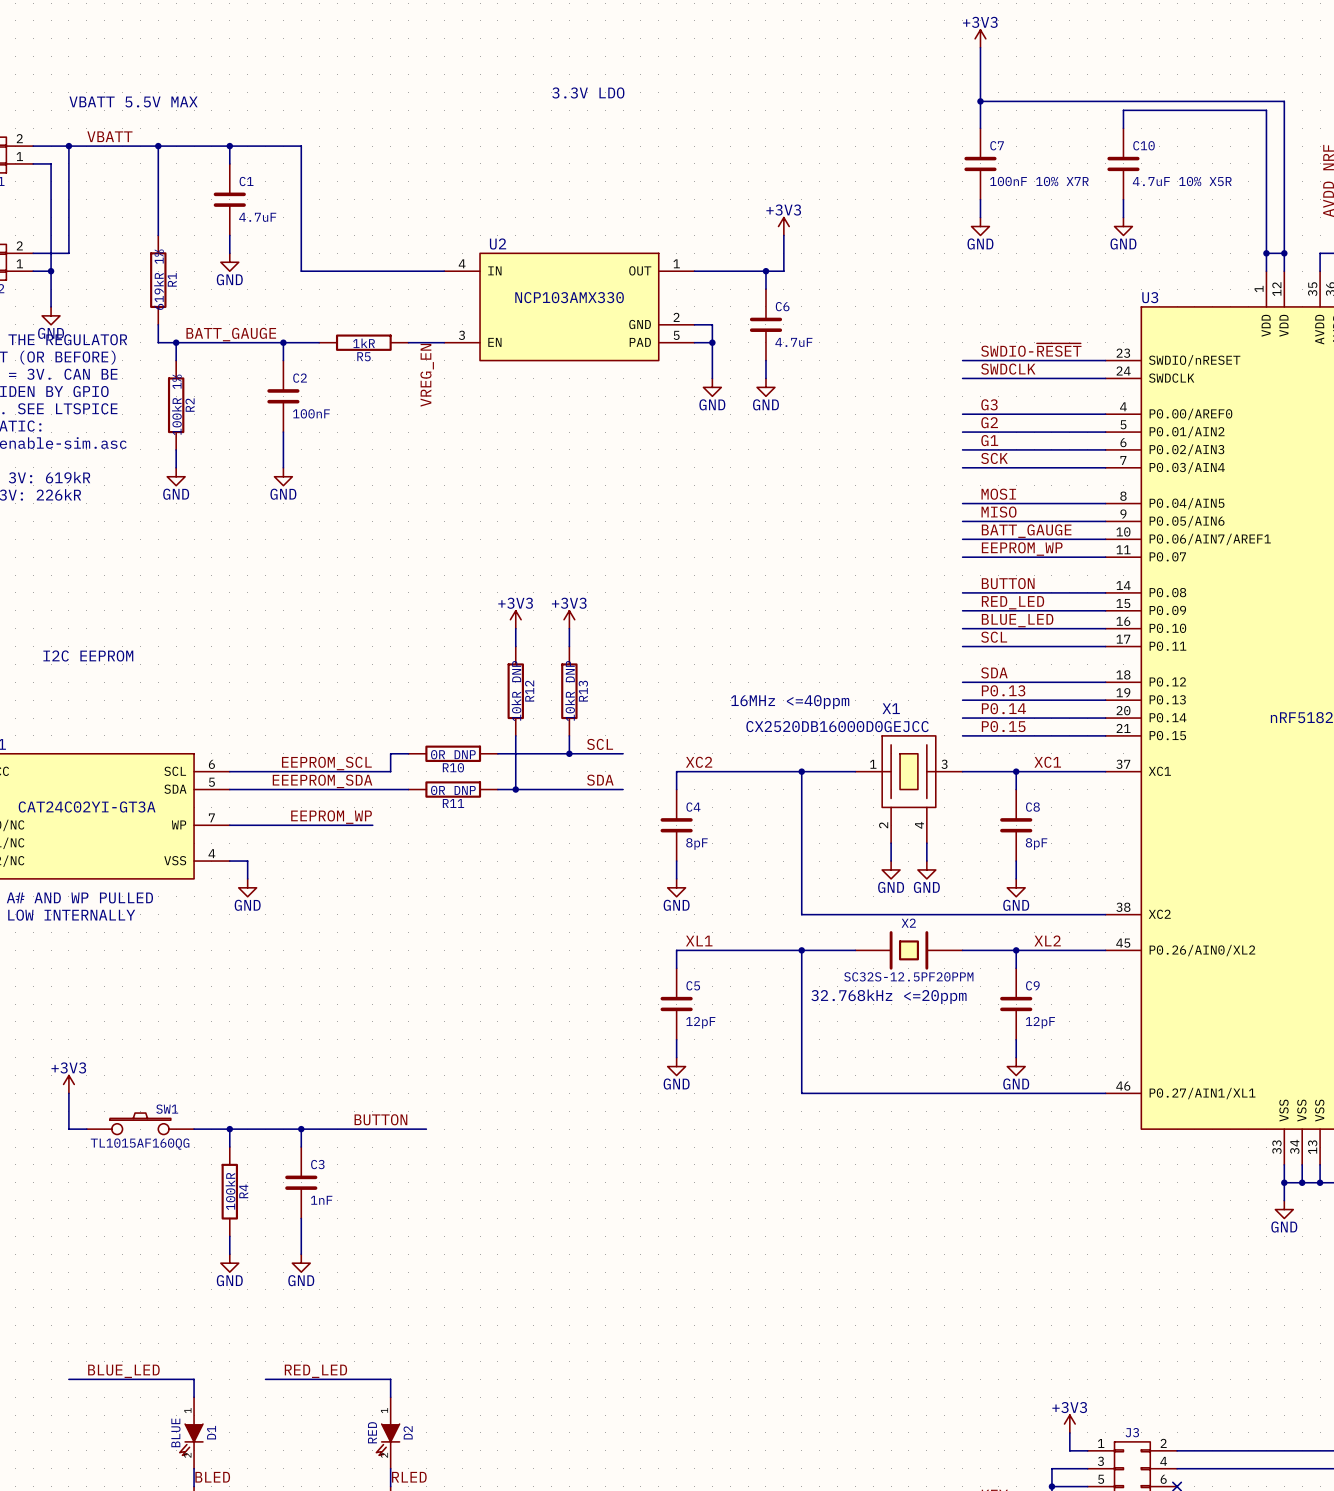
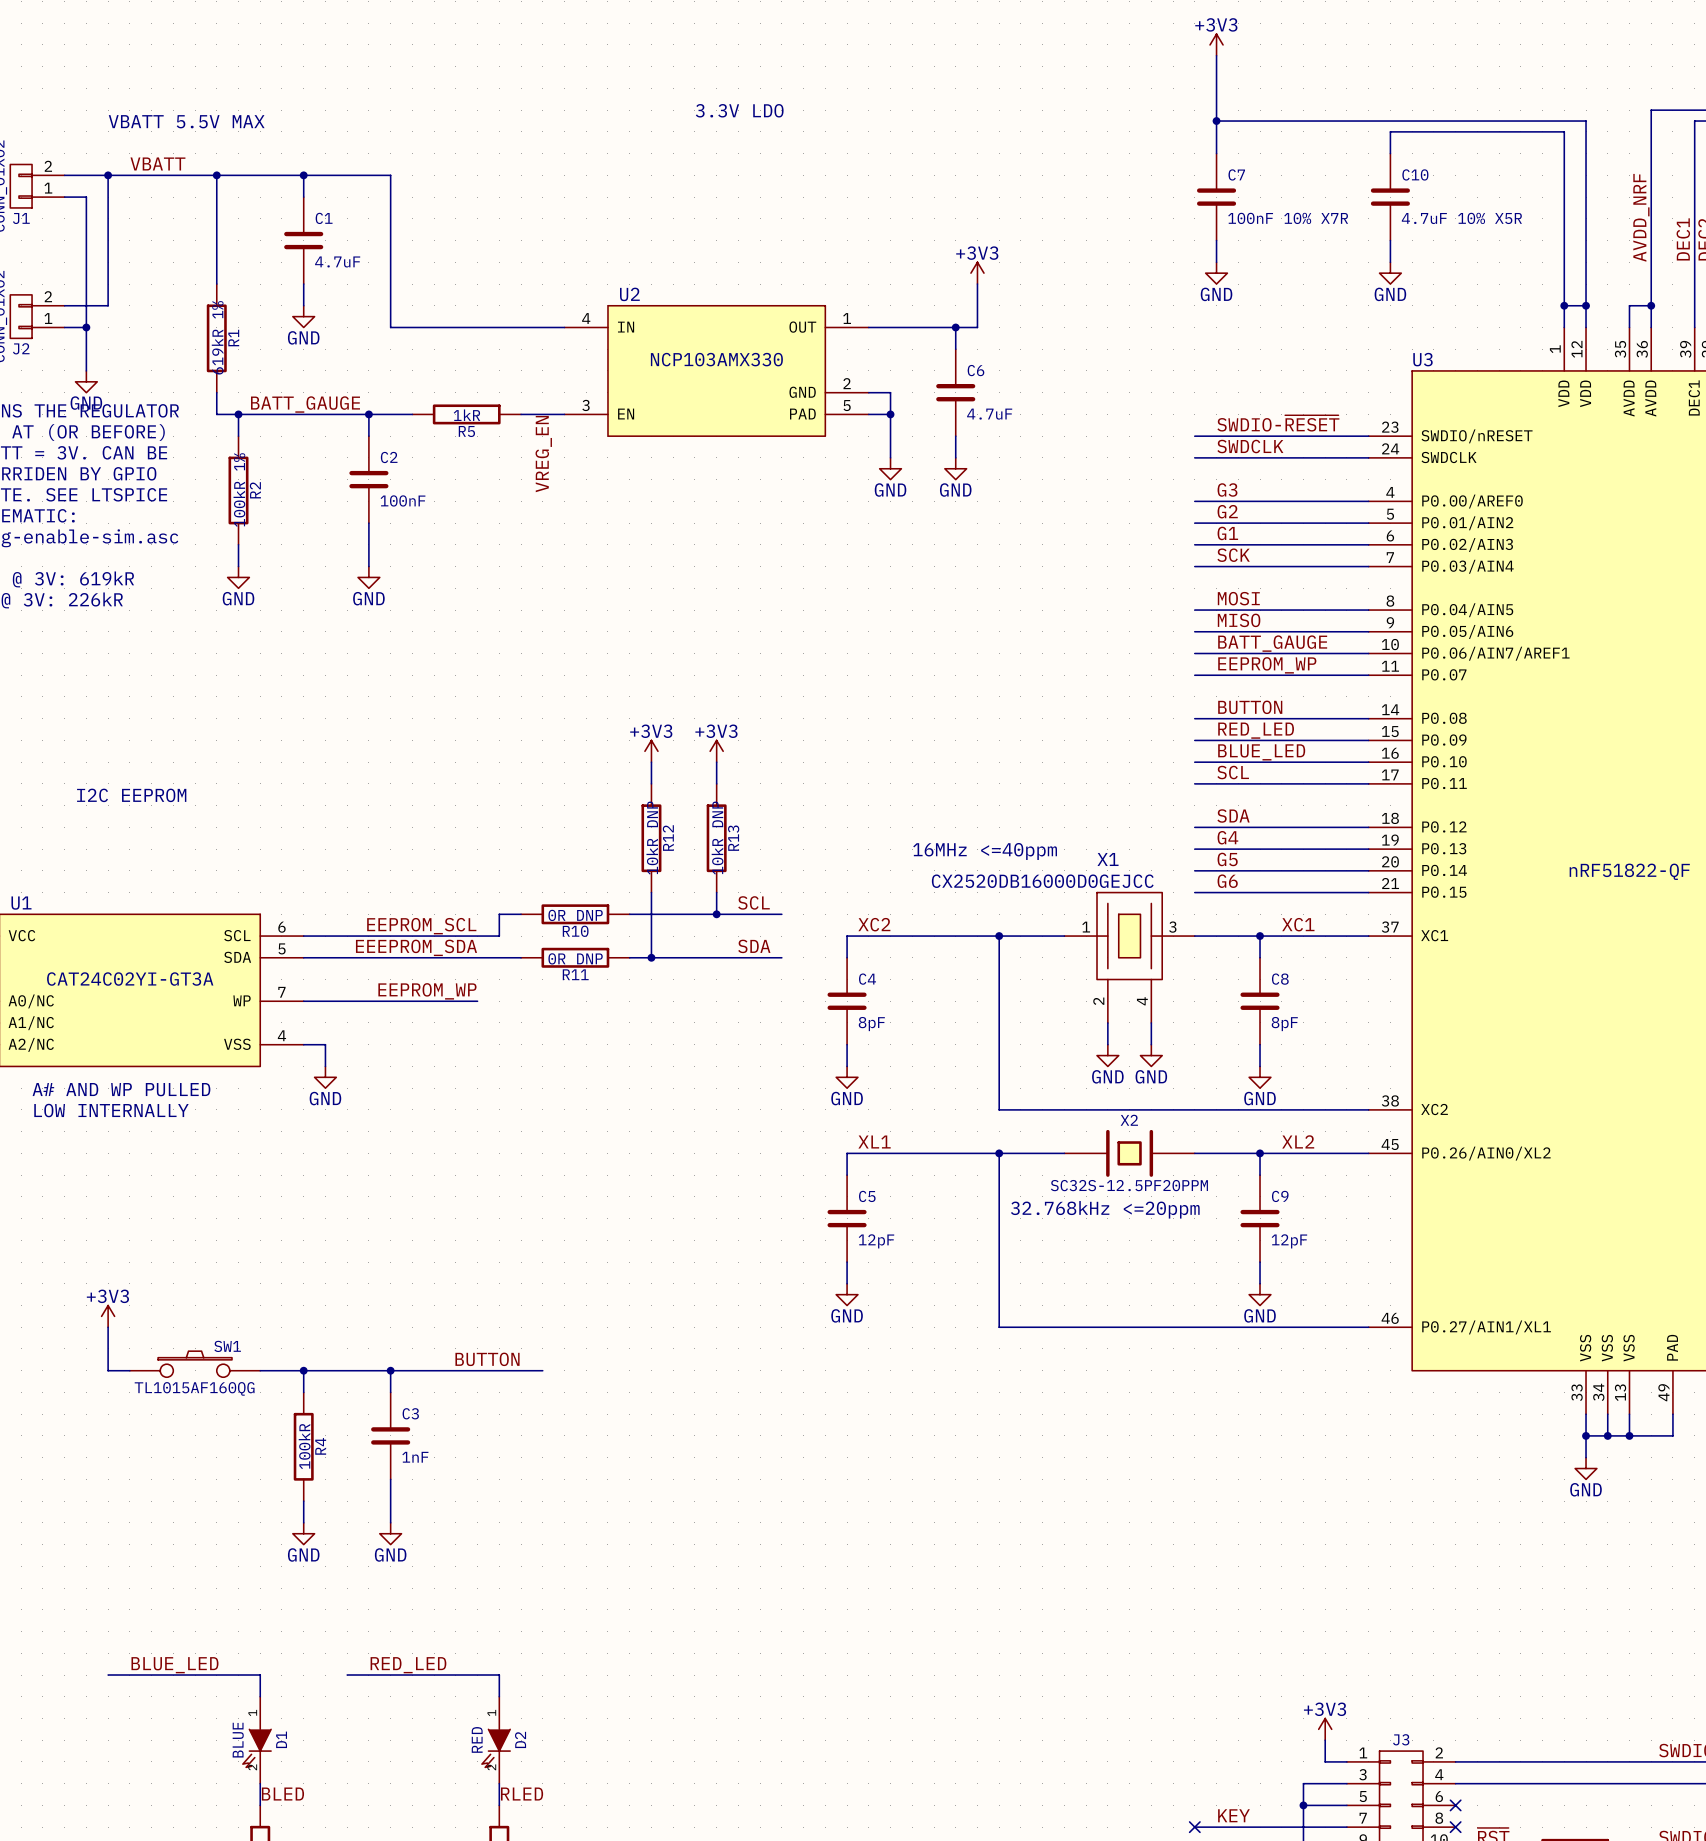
label: P0.13 (1003, 690) -> G4 (1227, 837)
label: P0.14 (1003, 708) -> G5 (1227, 859)
label: P0.15 (1003, 726) -> G6 (1227, 881)

